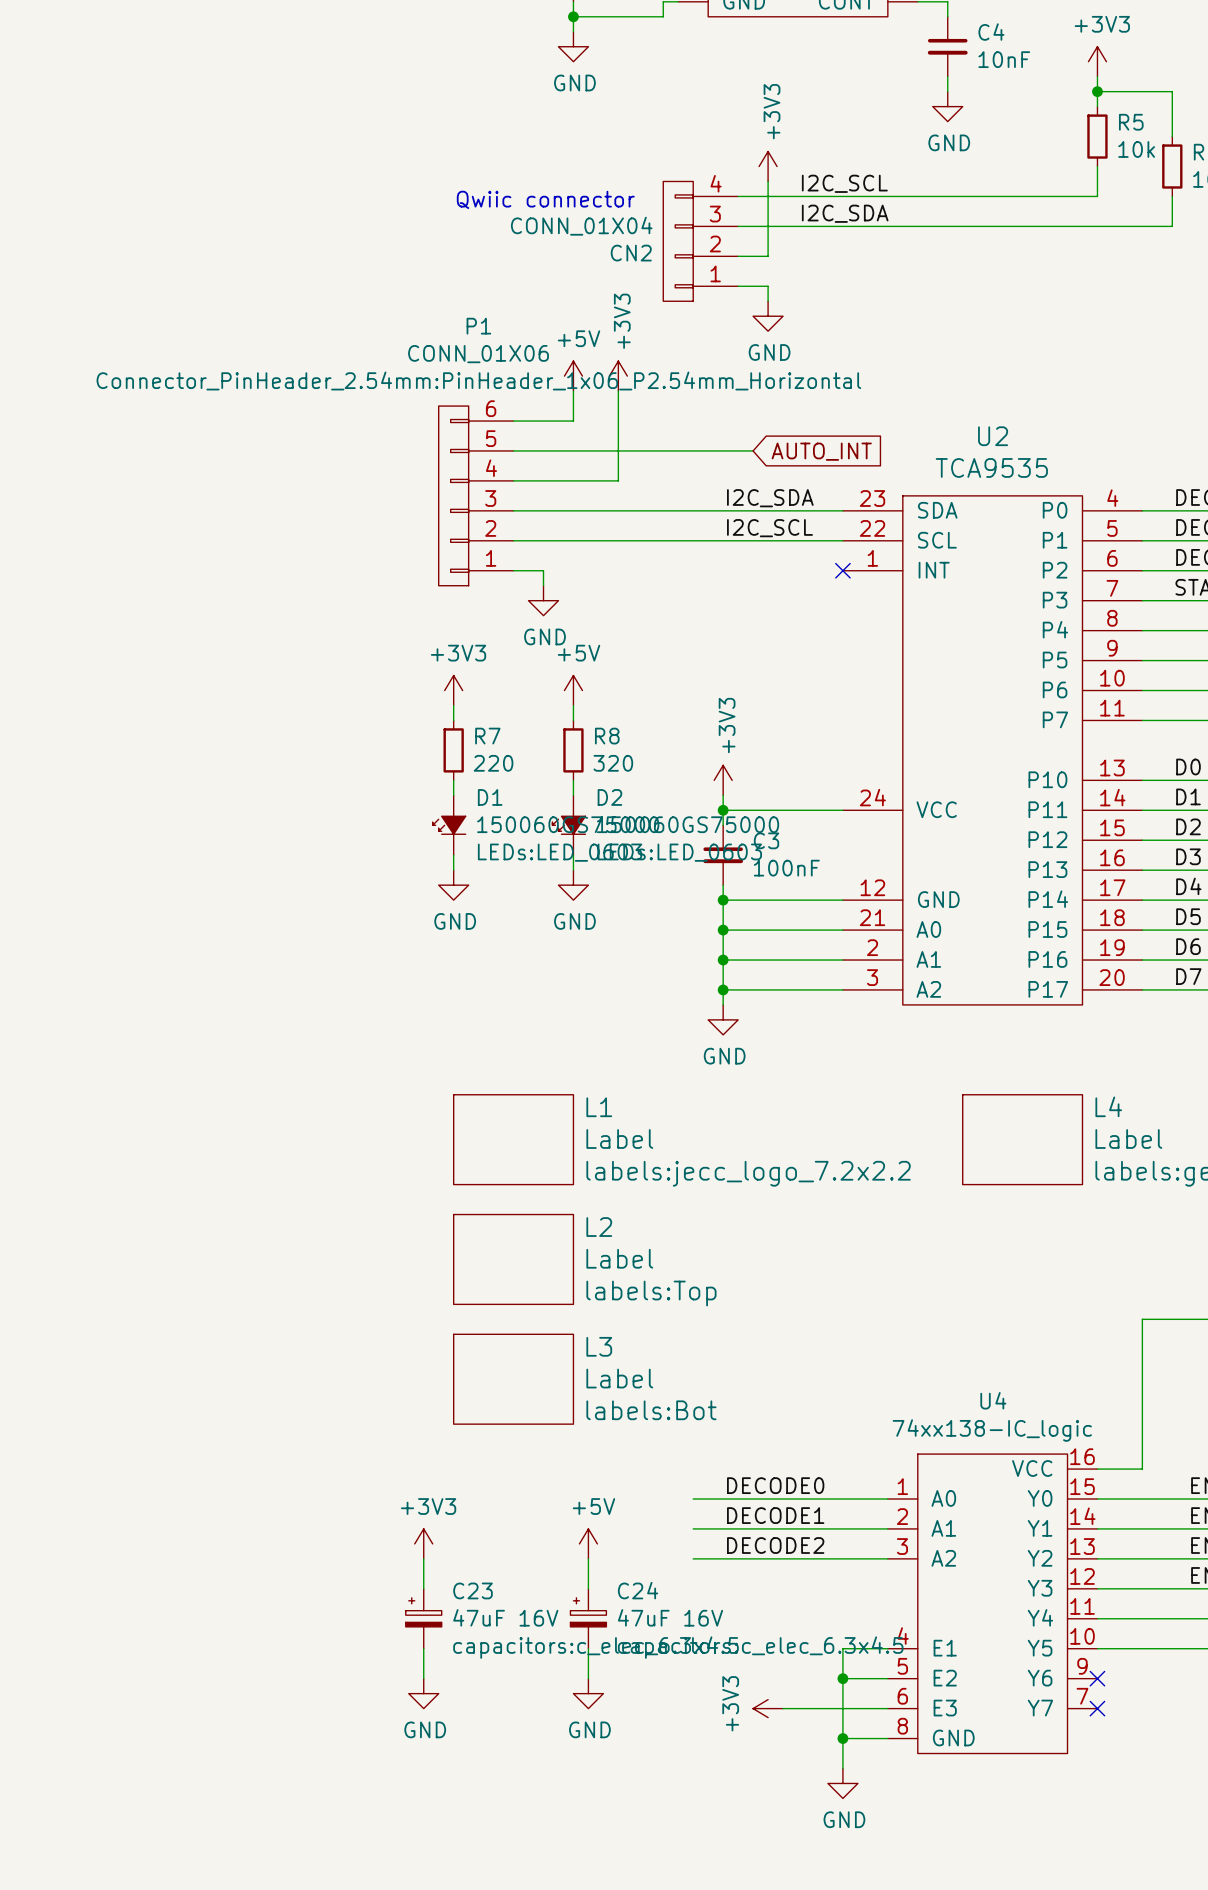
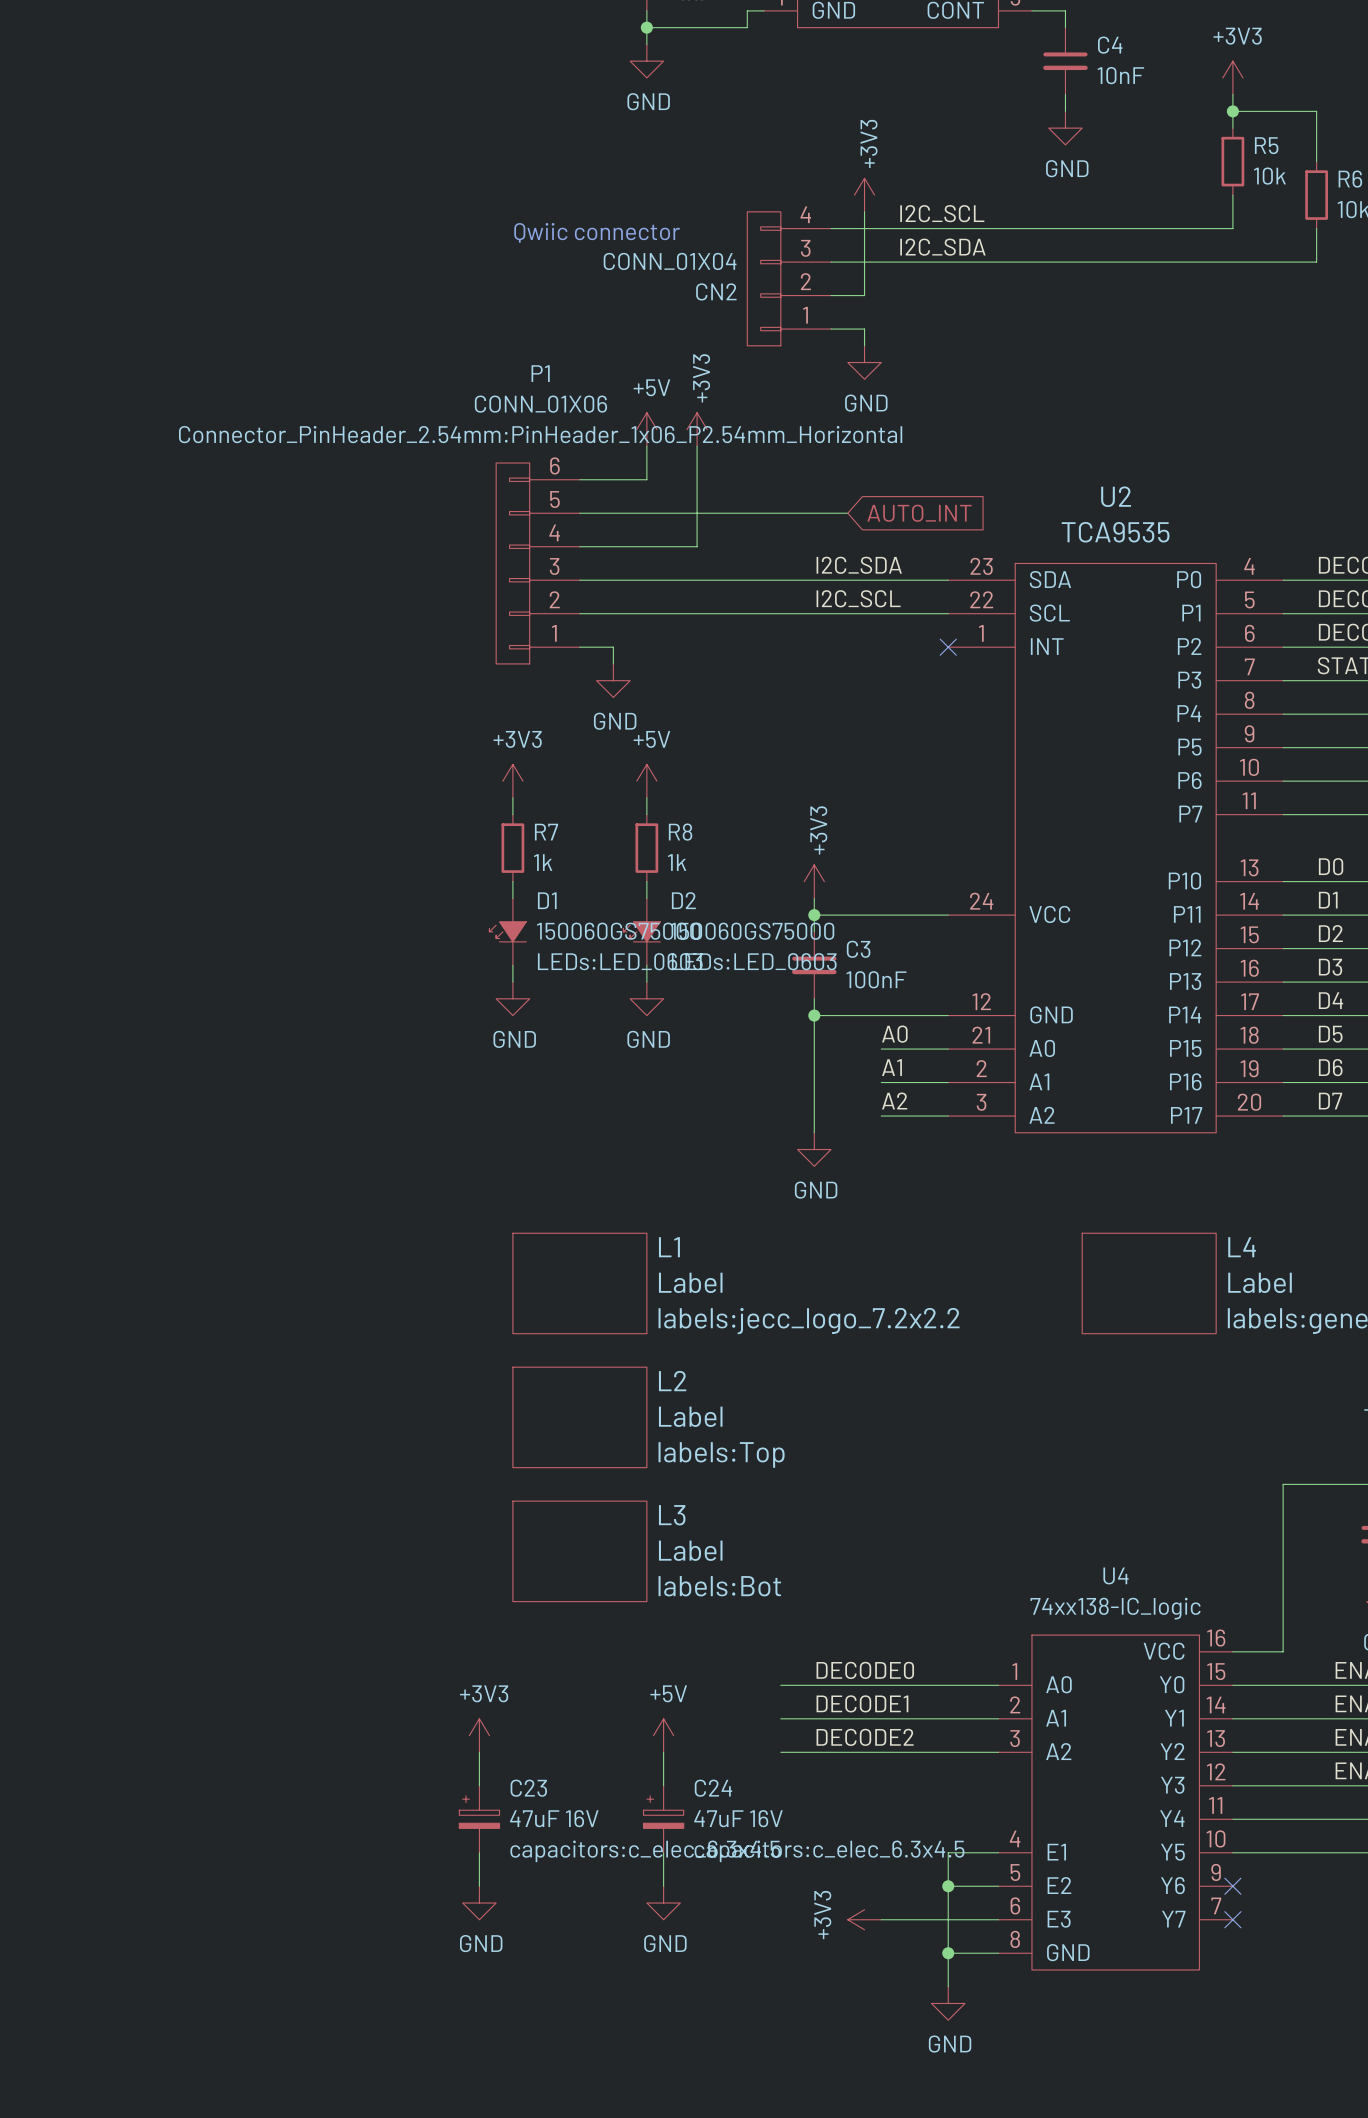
R7 value: 220 (493, 763) -> 1k (543, 862)
R8 value: 320 (613, 763) -> 1k (677, 862)
label: none -> A0 (894, 1034)
wire: (723, 930) (783, 930) -> none
junction: (723, 930) -> none
label: none -> A1 (892, 1067)
wire: (723, 960) (783, 960) -> none
junction: (723, 960) -> none
label: none -> A2 (894, 1100)
wire: (723, 989) (783, 989) -> none
junction: (723, 989) -> none

